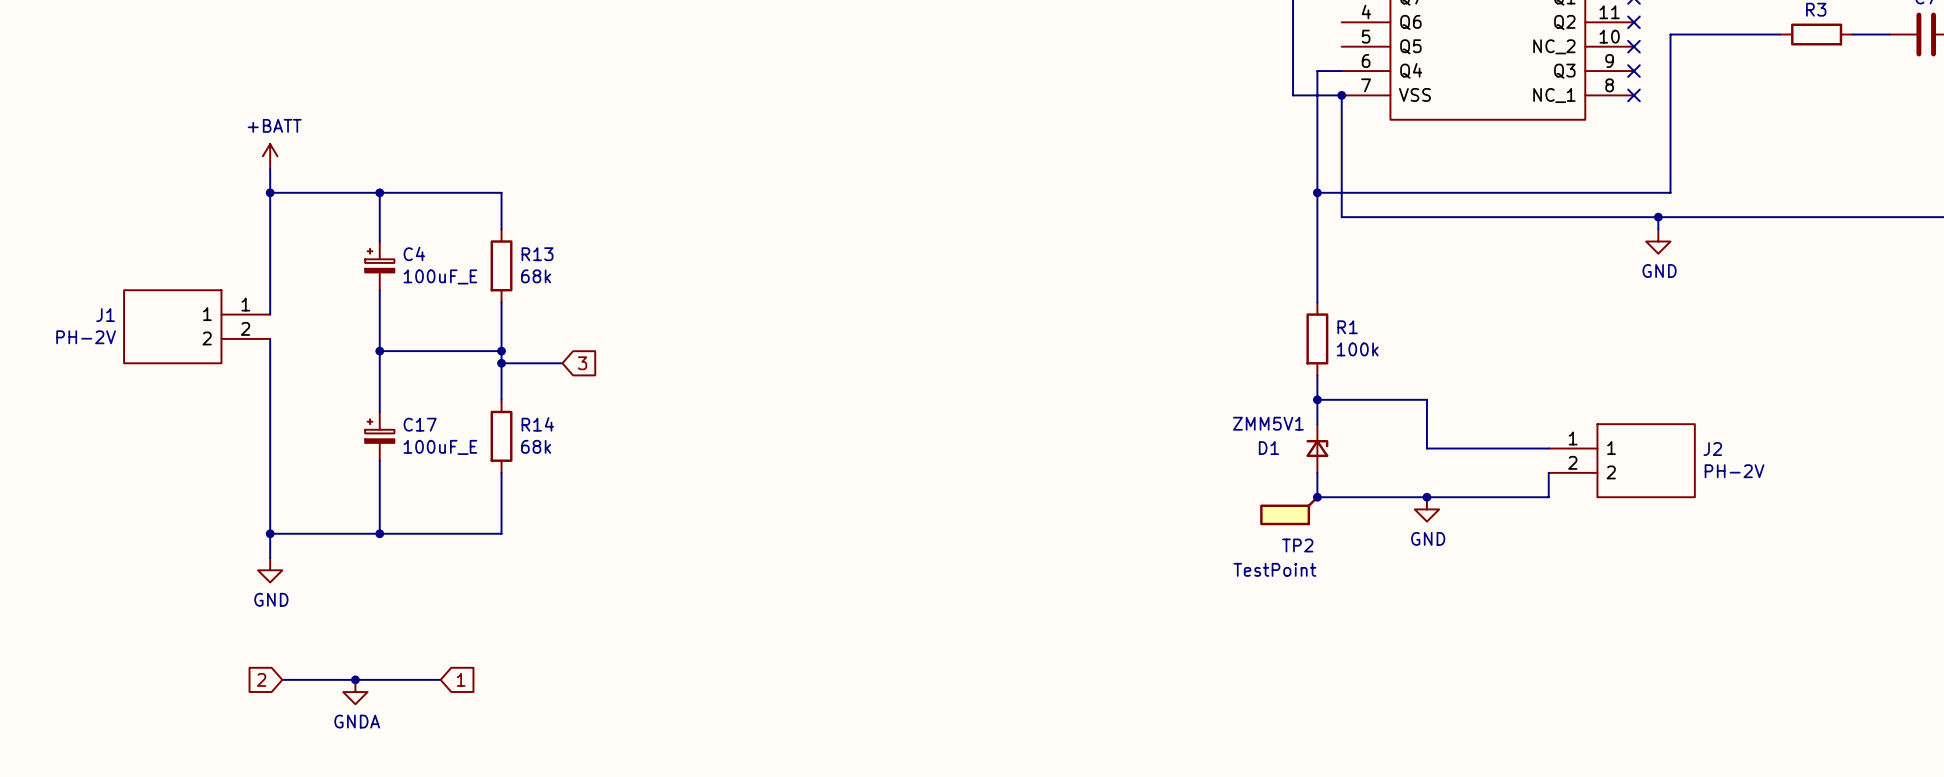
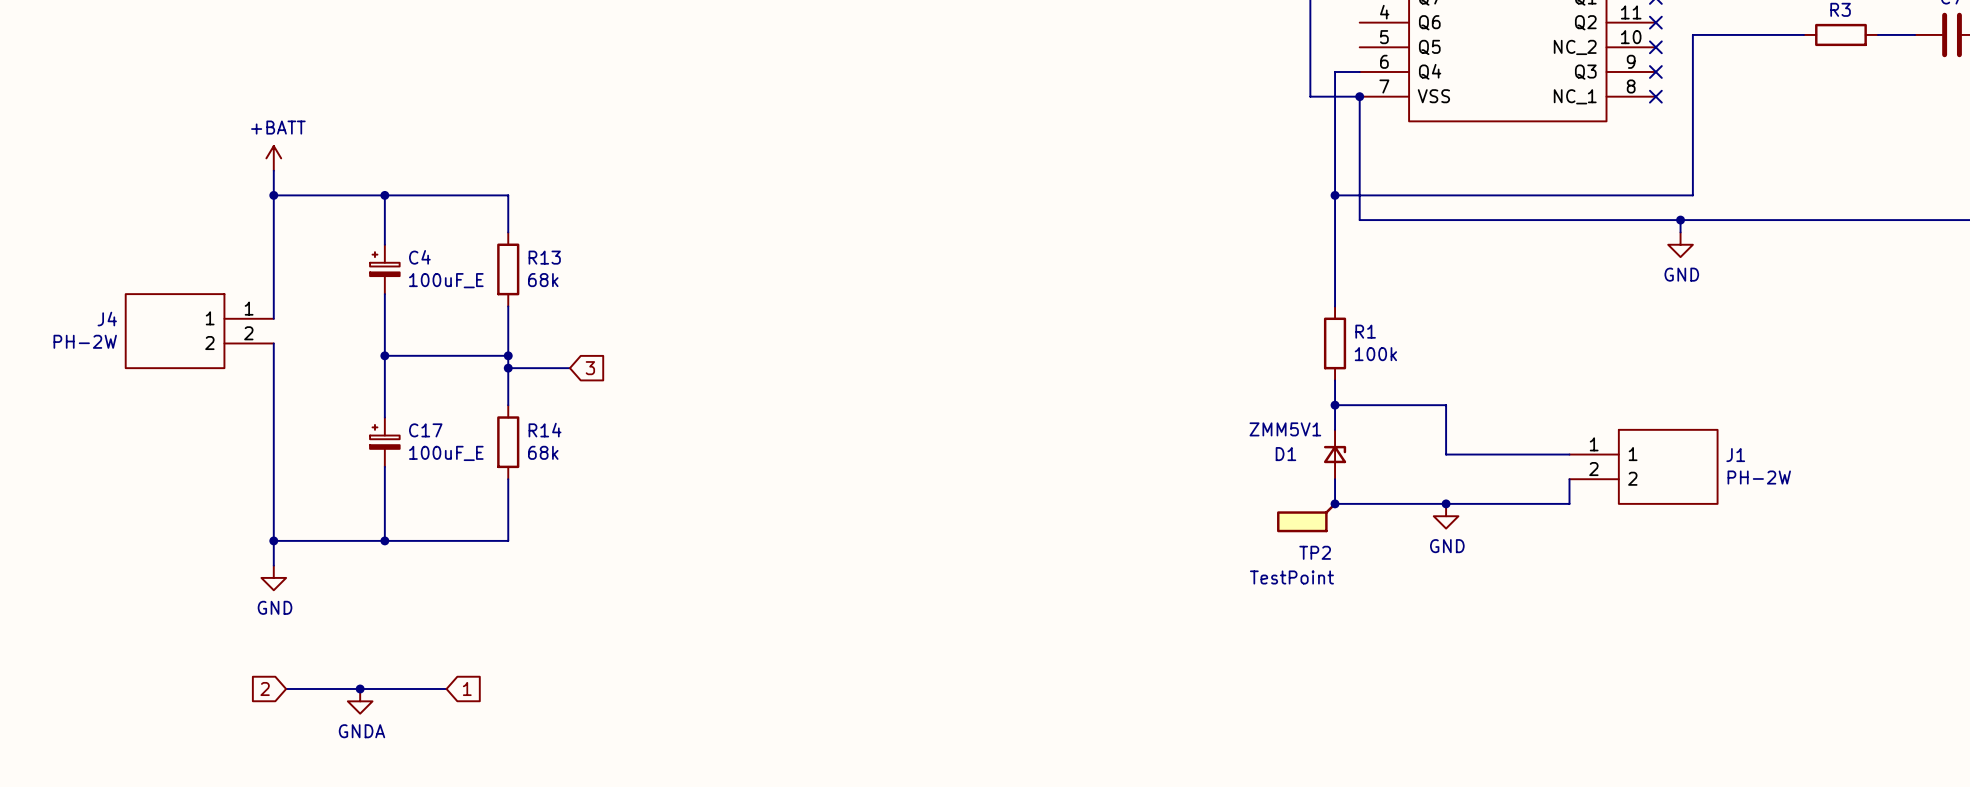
J1 name: J1 (105, 315) -> J4 (107, 319)
J1 value: PH-2V (86, 337) -> PH-2W (85, 341)
J2 name: J2 (1712, 449) -> J1 (1735, 455)
J2 value: PH-2V (1734, 471) -> PH-2W (1759, 477)

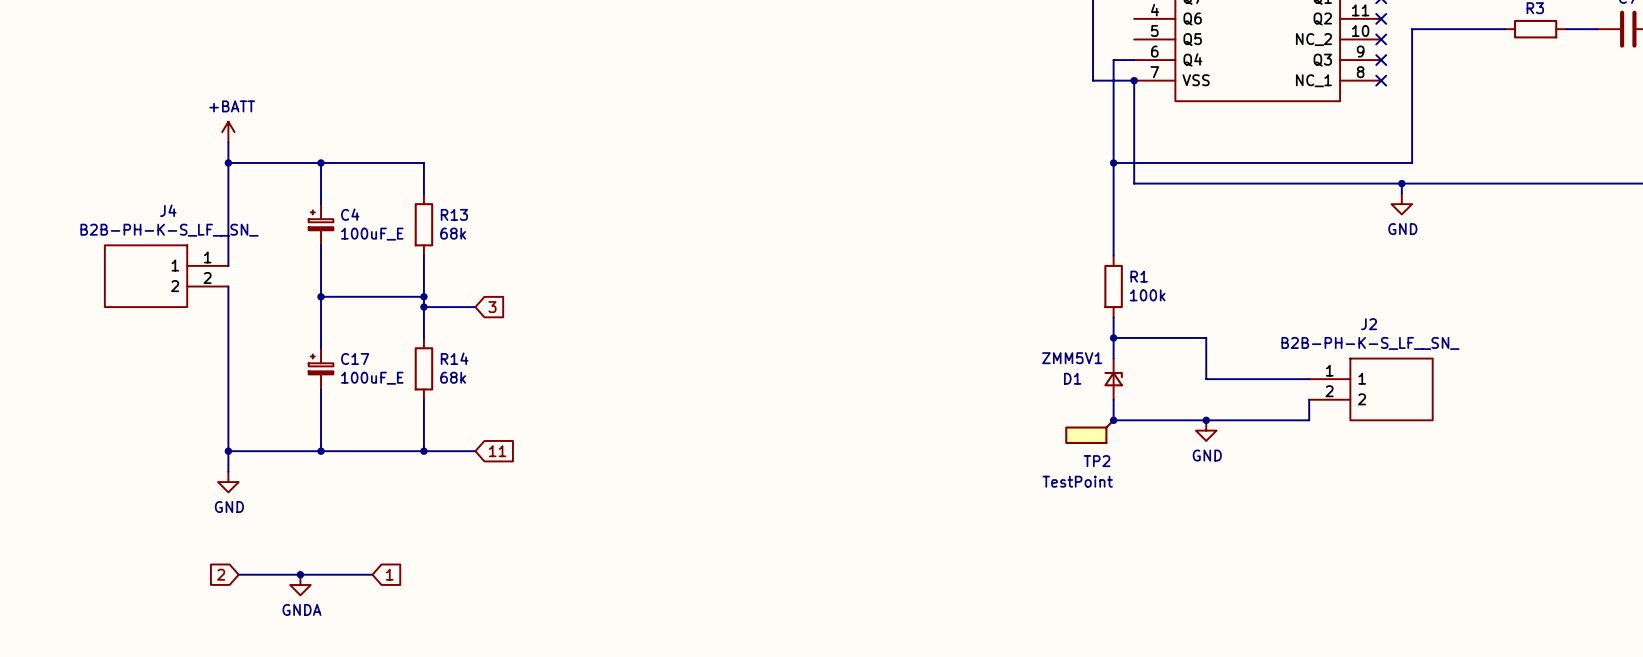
J4 name position: J4 (107, 319) -> J4 (168, 210)
J4 value: PH-2W (85, 341) -> B2B-PH-K-S_LF__SN_ (169, 230)
J1 name: J1 (1735, 455) -> J2 (1369, 324)
J1 value: PH-2W (1759, 477) -> B2B-PH-K-S_LF__SN_ (1370, 343)
wire: none -> (423, 451) (475, 451)
junction: none -> (423, 451)
global label: none -> 11 (497, 451)

